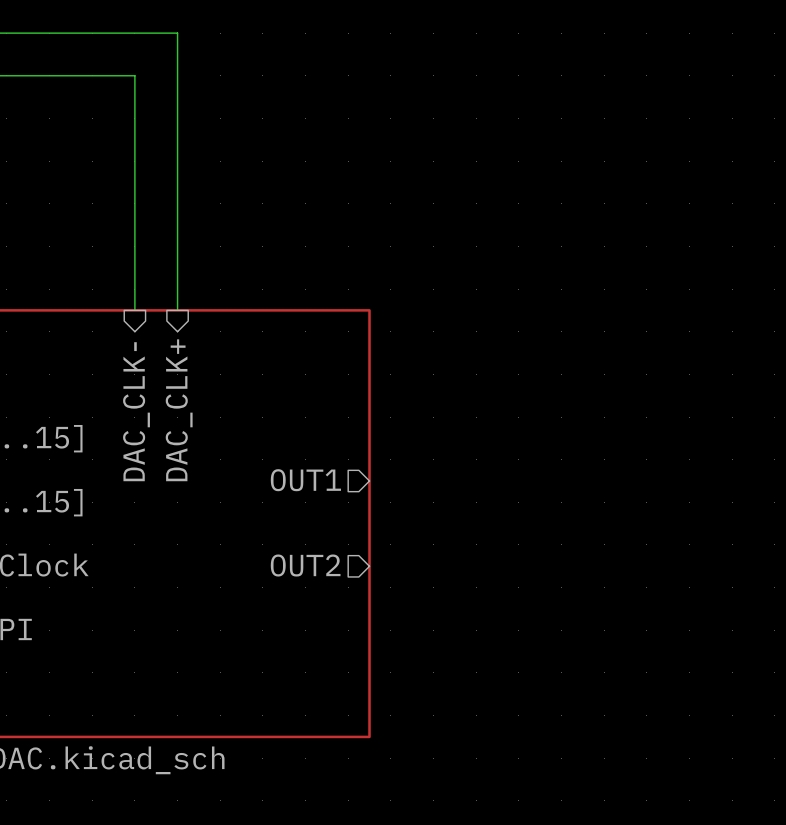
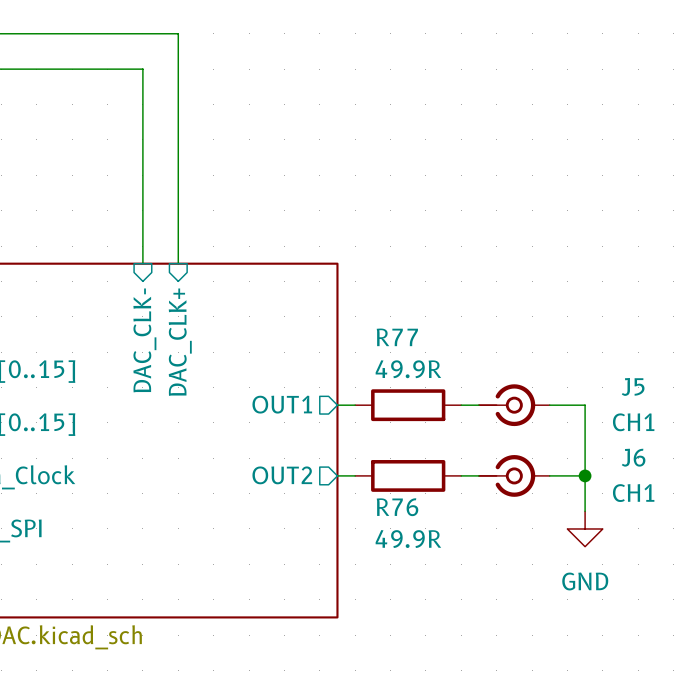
wire: none -> (337, 405) (355, 405)
R76: none -> 49.9R (408, 405)
wire: none -> (461, 405) (478, 405)
J5: none -> CH1 (514, 405)
wire: none -> (549, 405) (585, 405) (585, 511)
wire: none -> (337, 475) (355, 475)
R77: none -> 49.9R (408, 475)
wire: none -> (461, 475) (478, 475)
J6: none -> CH1 (514, 475)
wire: none -> (549, 475) (585, 475)
junction: none -> (585, 475)
power symbol: none -> GND (585, 528)

